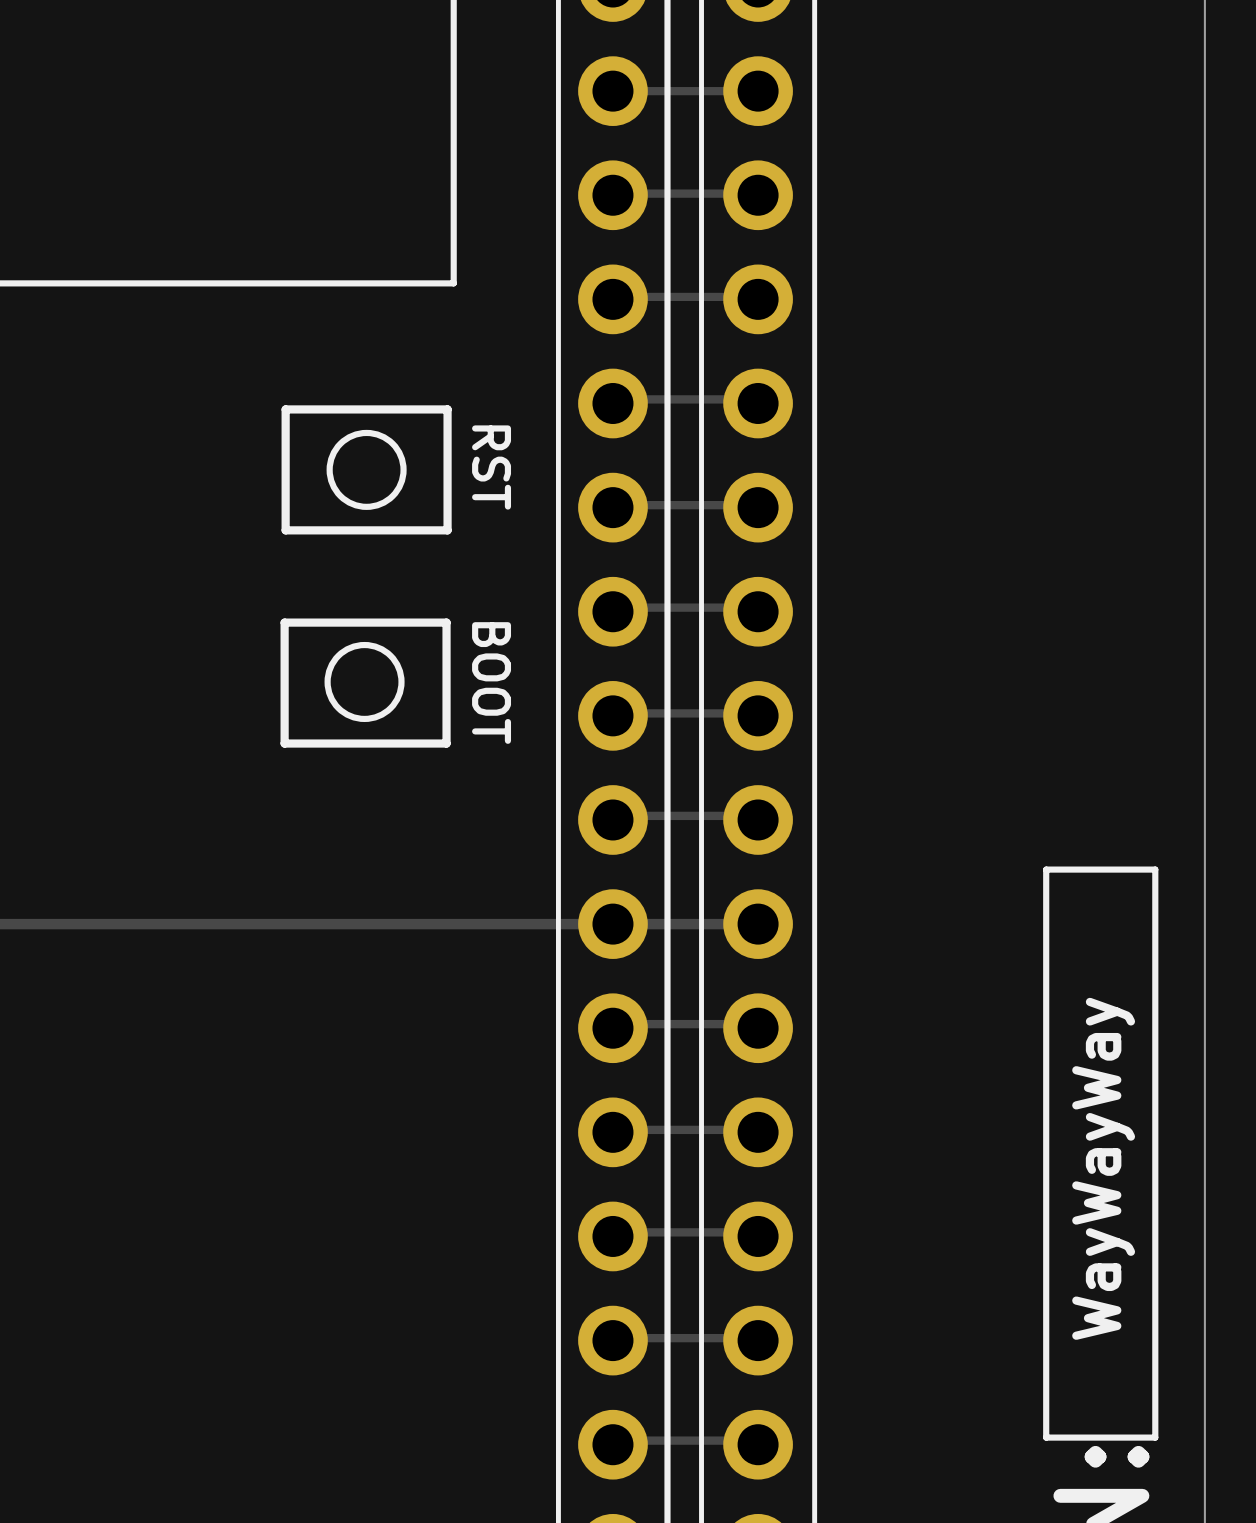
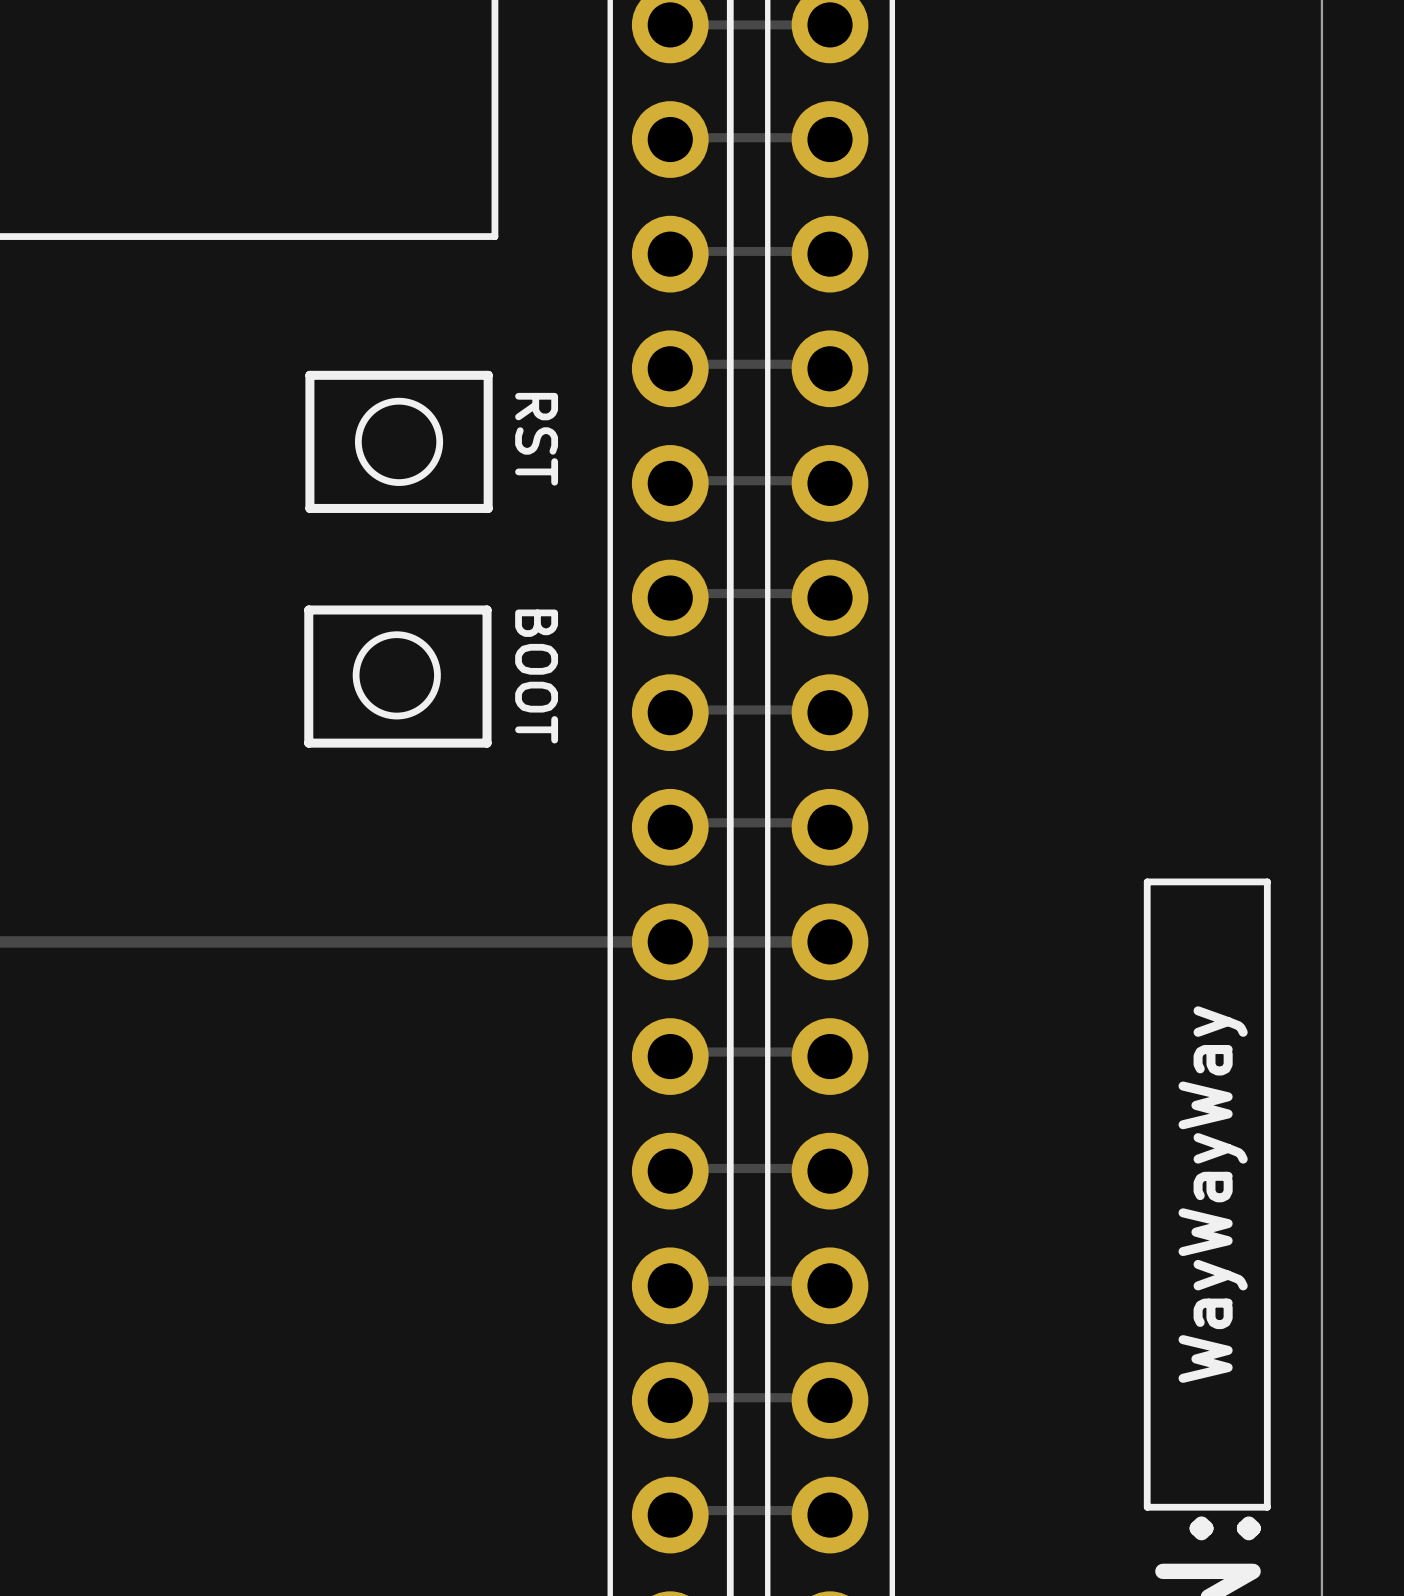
text position: WayWayWay (1103, 1168) -> WayWayWay (1213, 1194)

